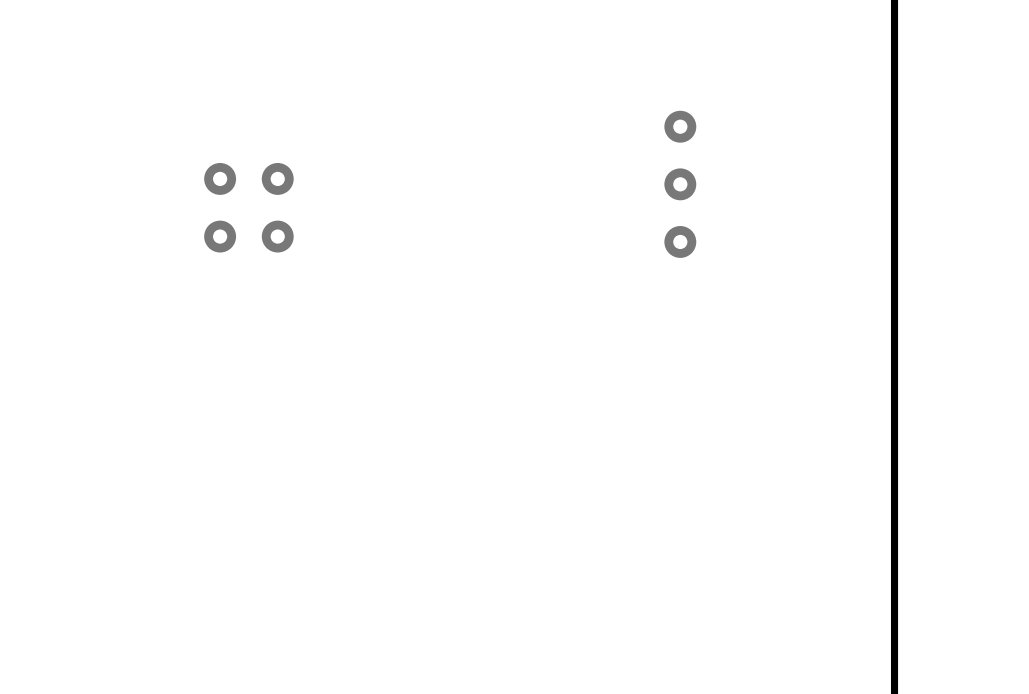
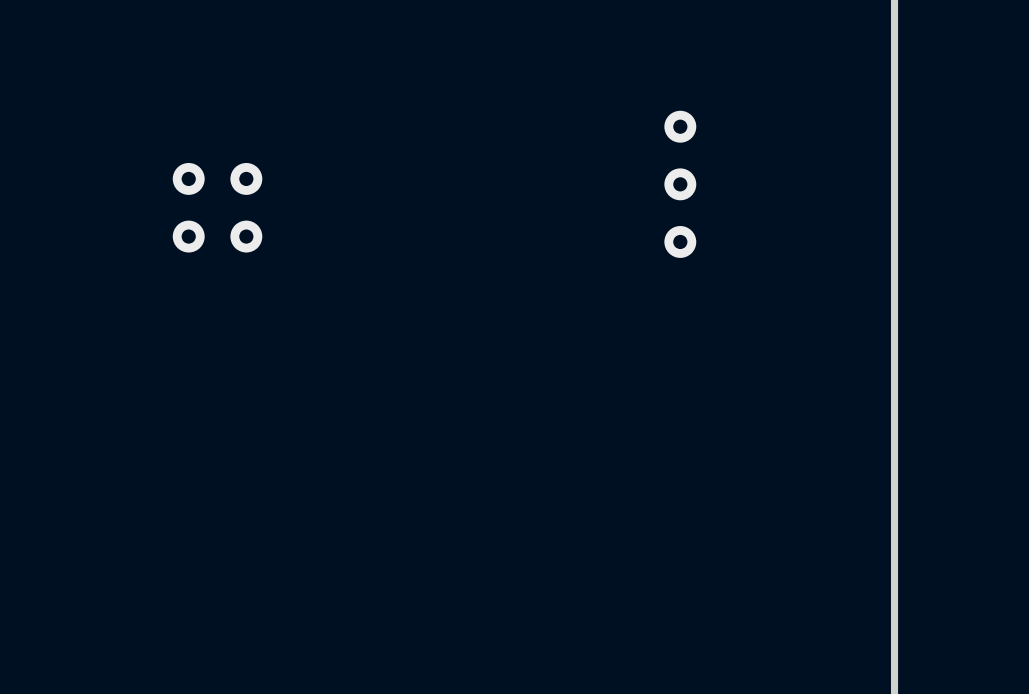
via: none -> (188, 178)
via: (220, 178) -> none
via: none -> (246, 178)
via: (277, 178) -> none
via: none -> (188, 236)
via: (220, 236) -> none
via: none -> (246, 236)
via: (277, 236) -> none

